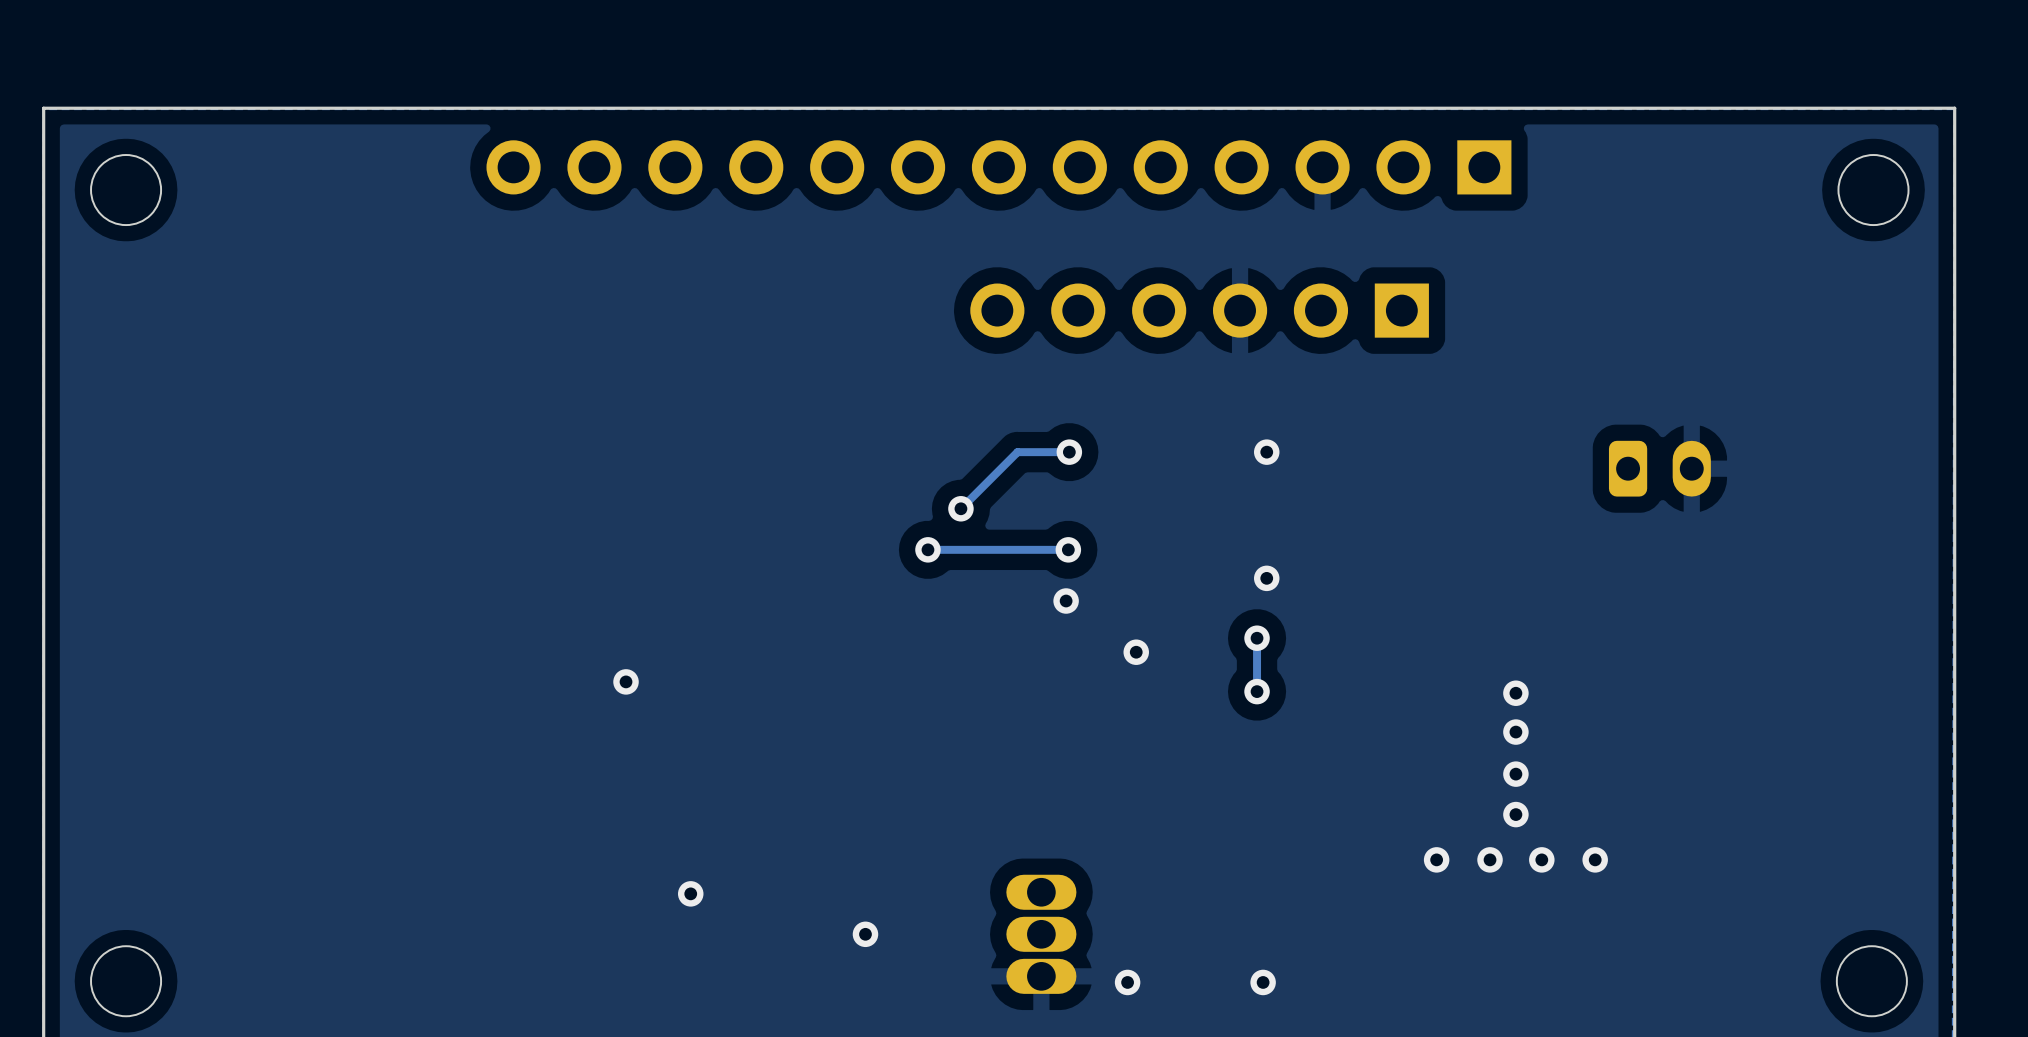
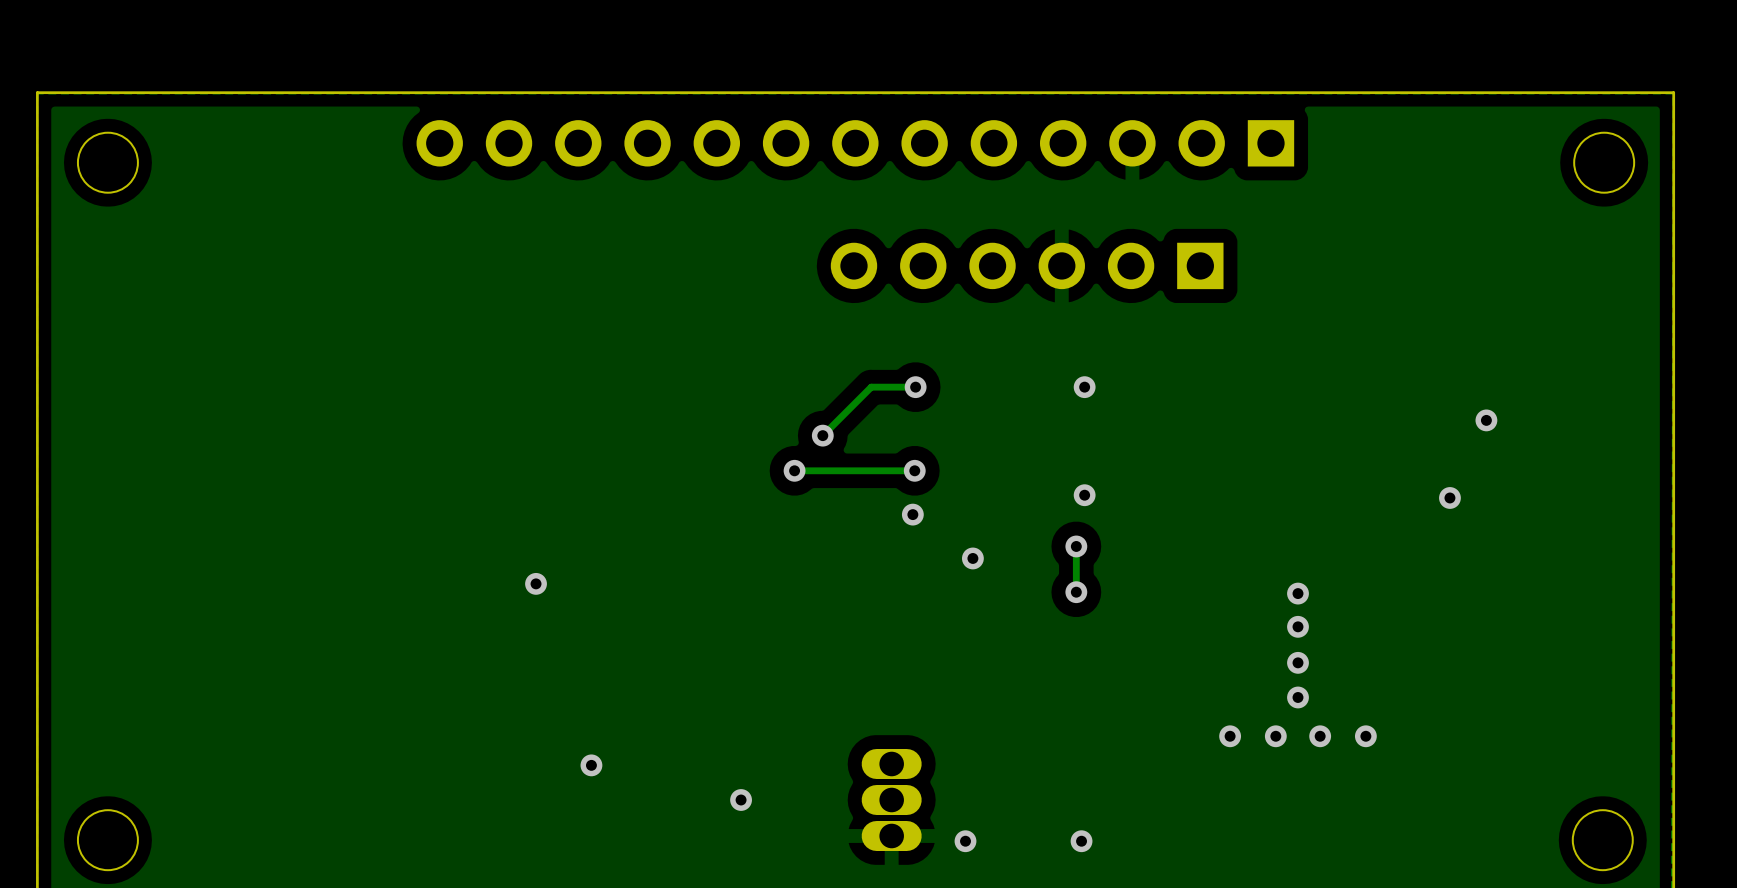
part: (1659, 468) -> none
via: none -> (1486, 420)
via: none -> (1449, 497)

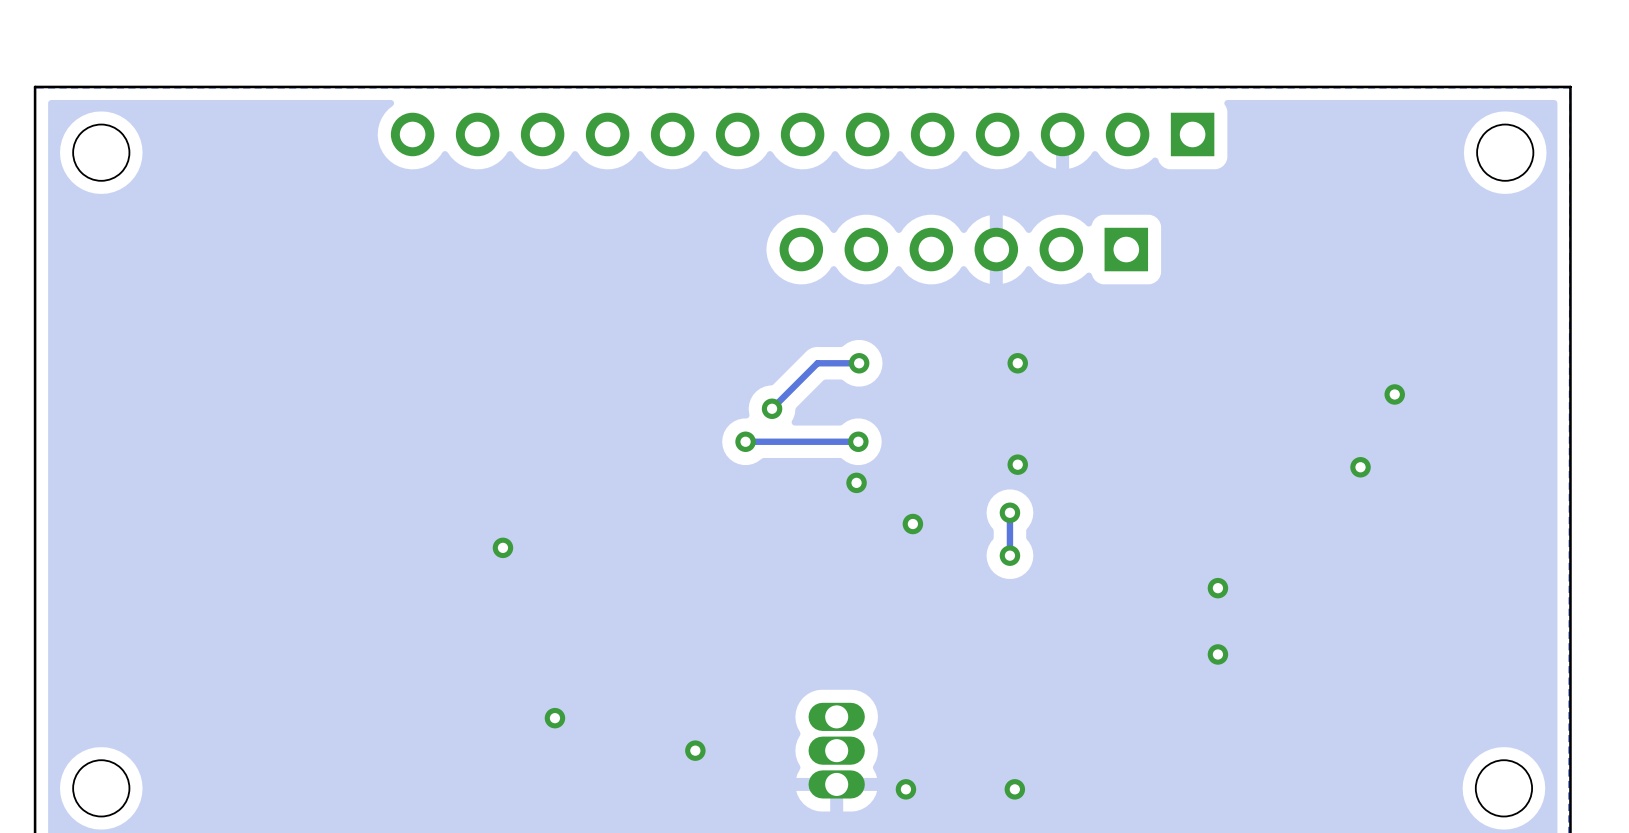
via: (1298, 593) -> none
via: (1298, 662) -> none
via: (1230, 736) -> none
via: (1275, 736) -> none
via: (1320, 736) -> none
via: (1365, 736) -> none

